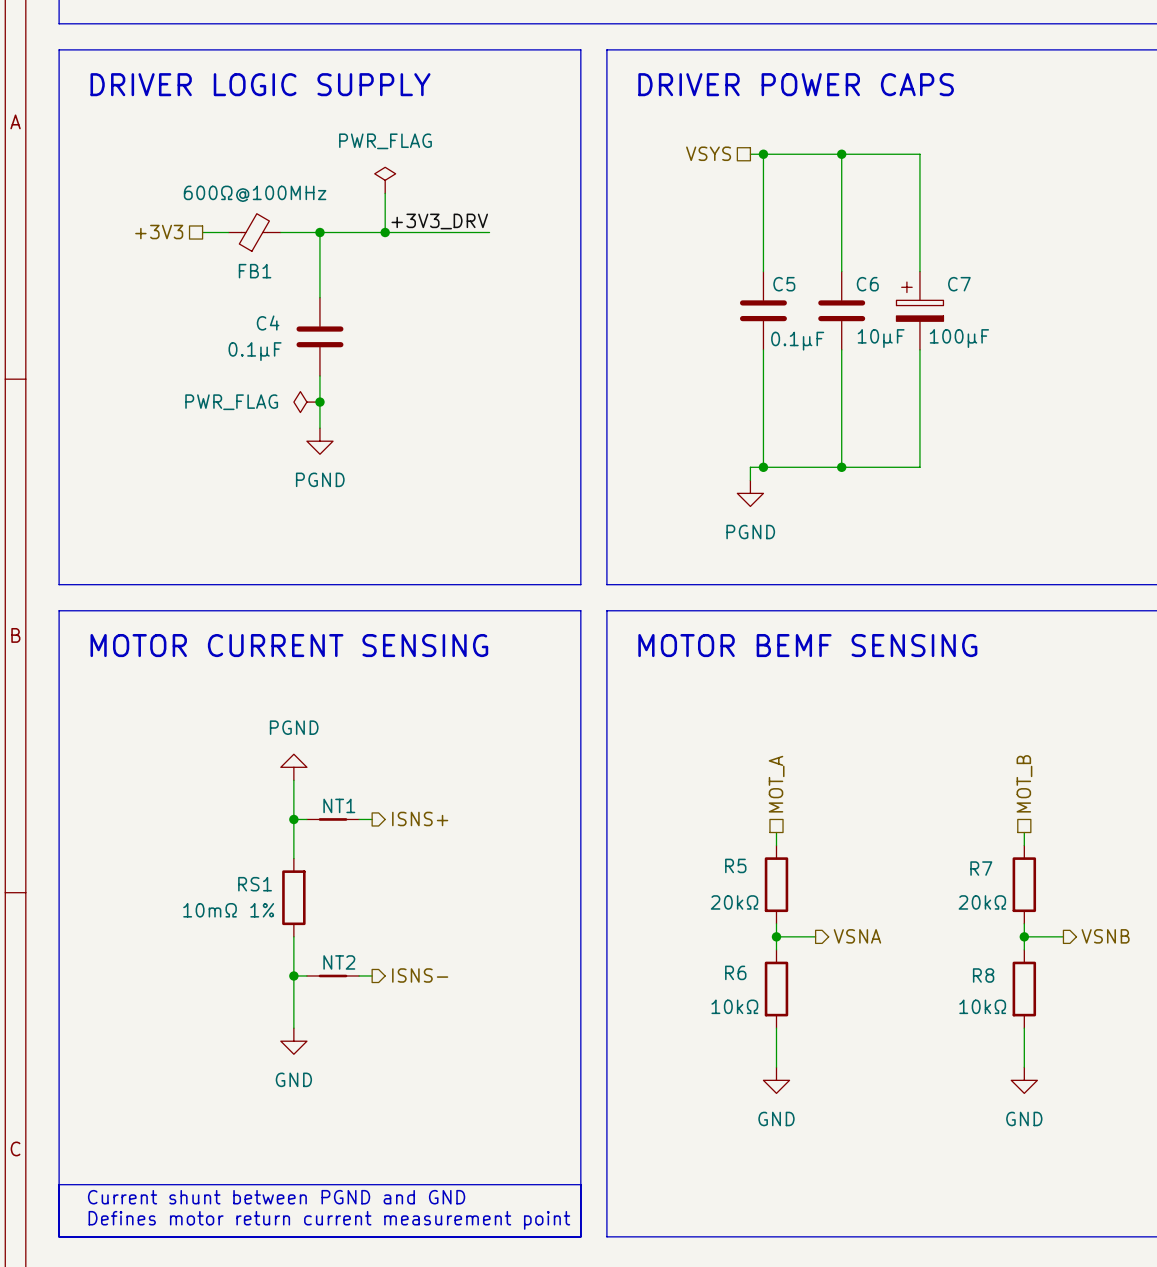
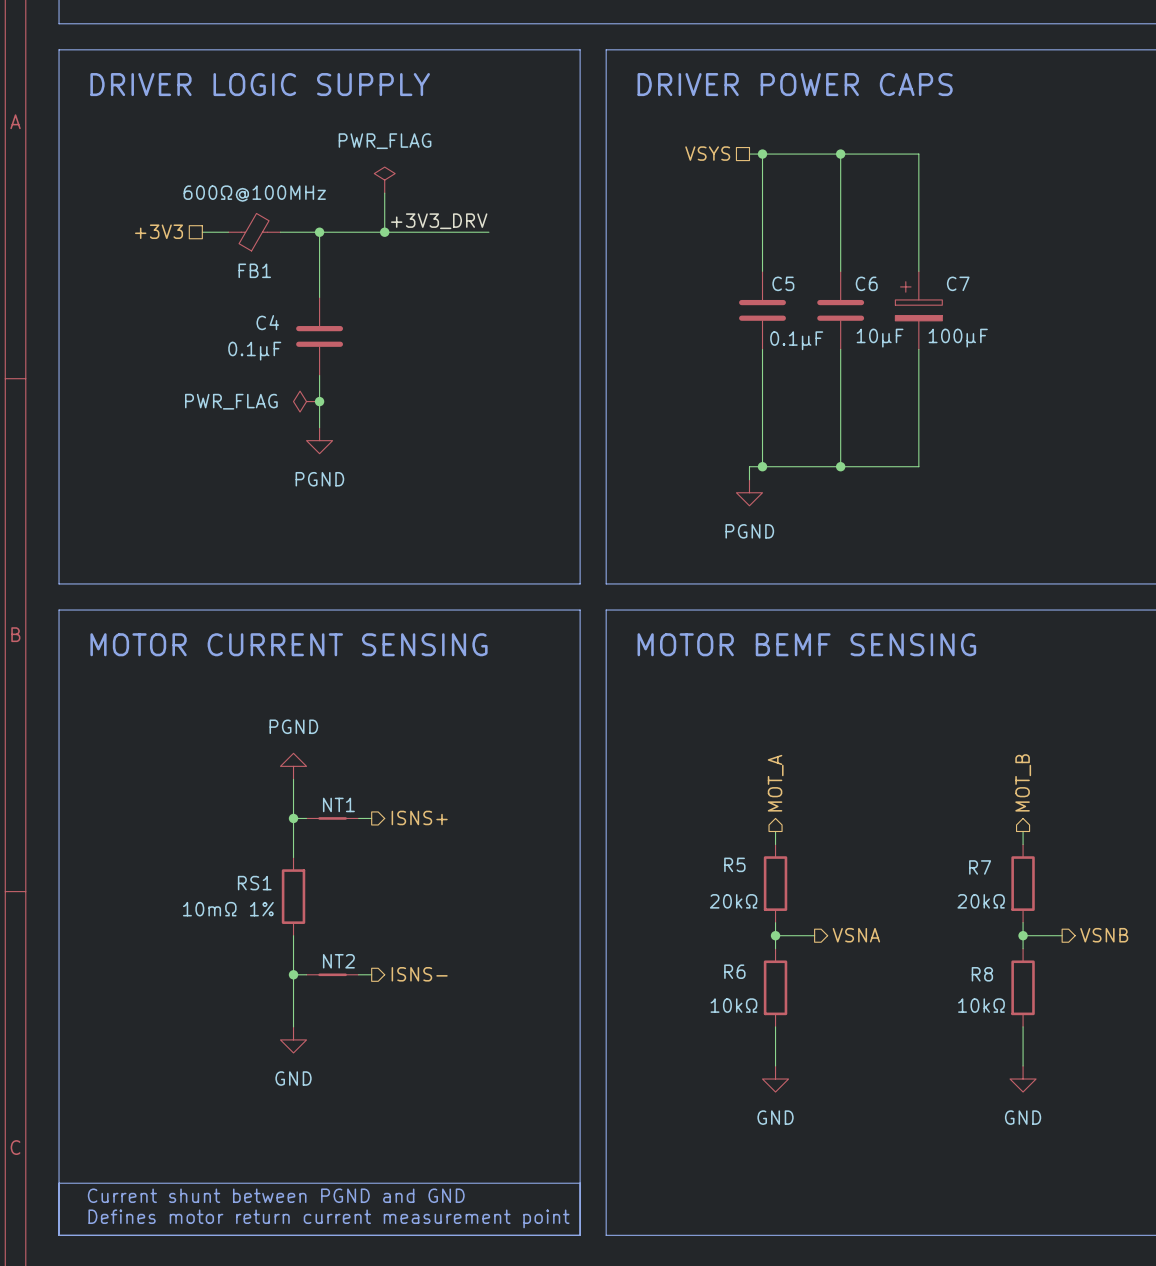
hierarchical label shape: passive (1024, 783) -> output (1023, 782)
hierarchical label shape: passive (776, 784) -> output (775, 783)

